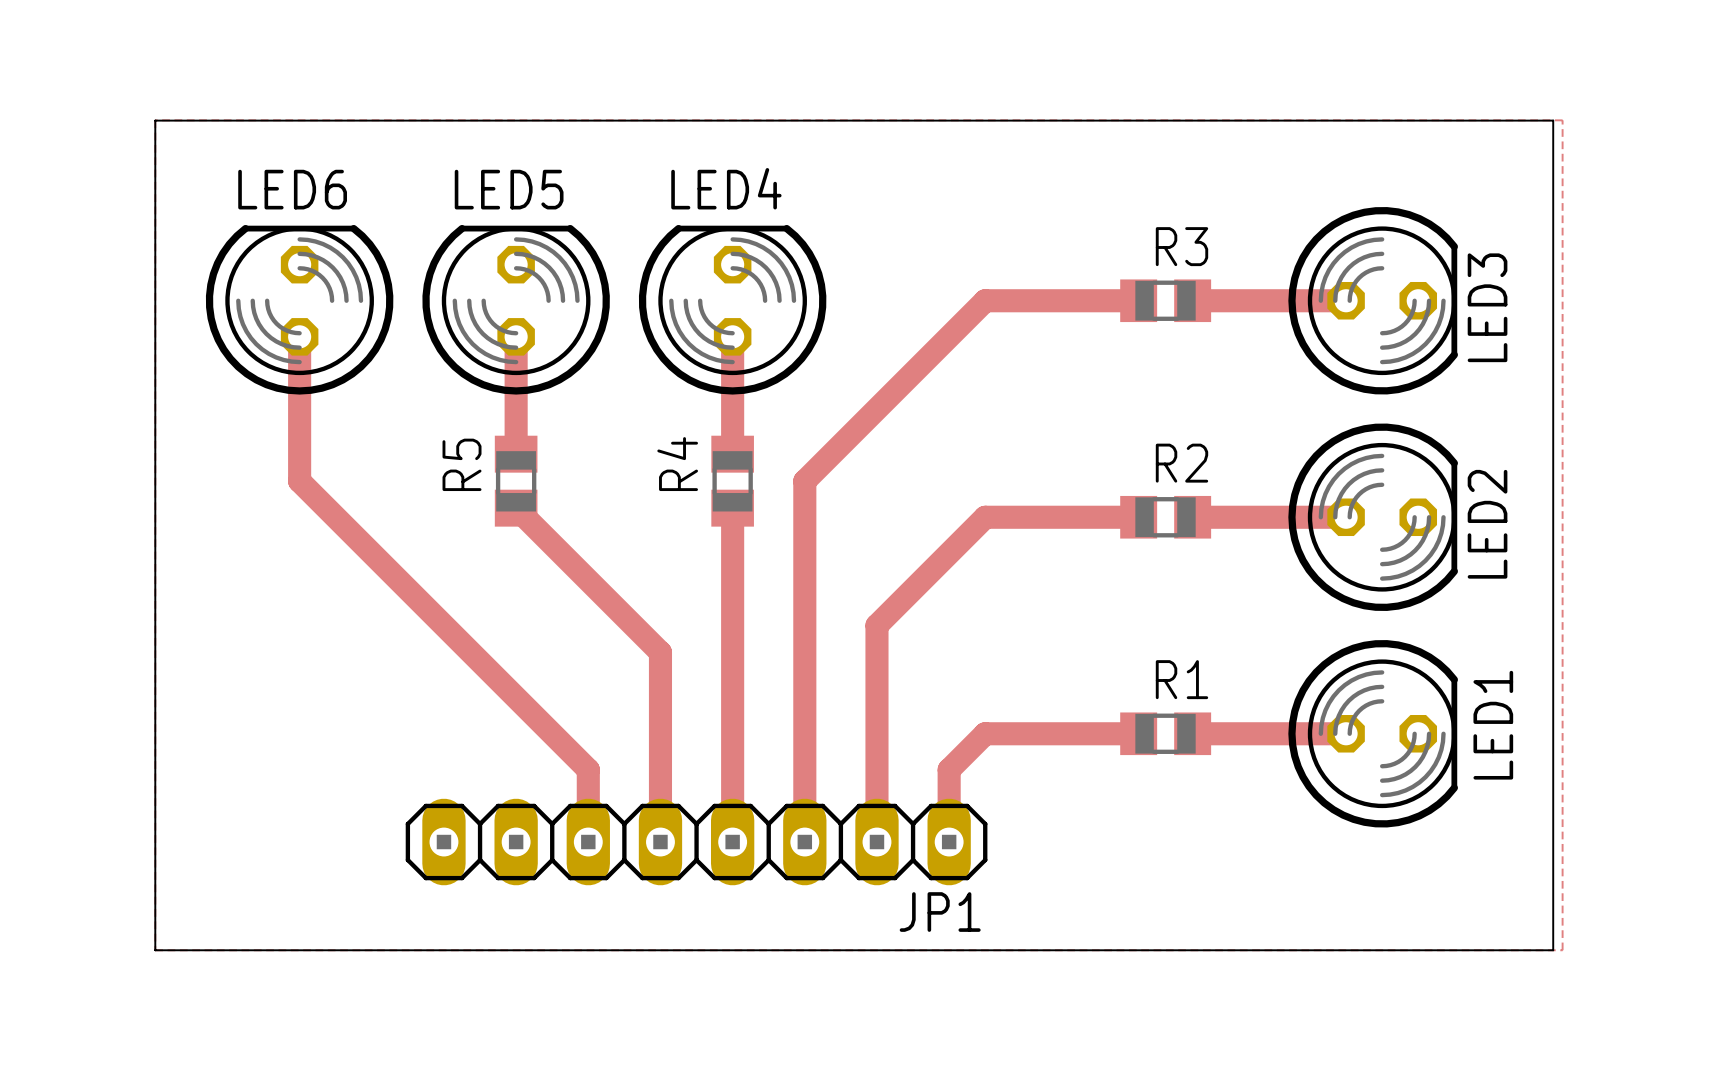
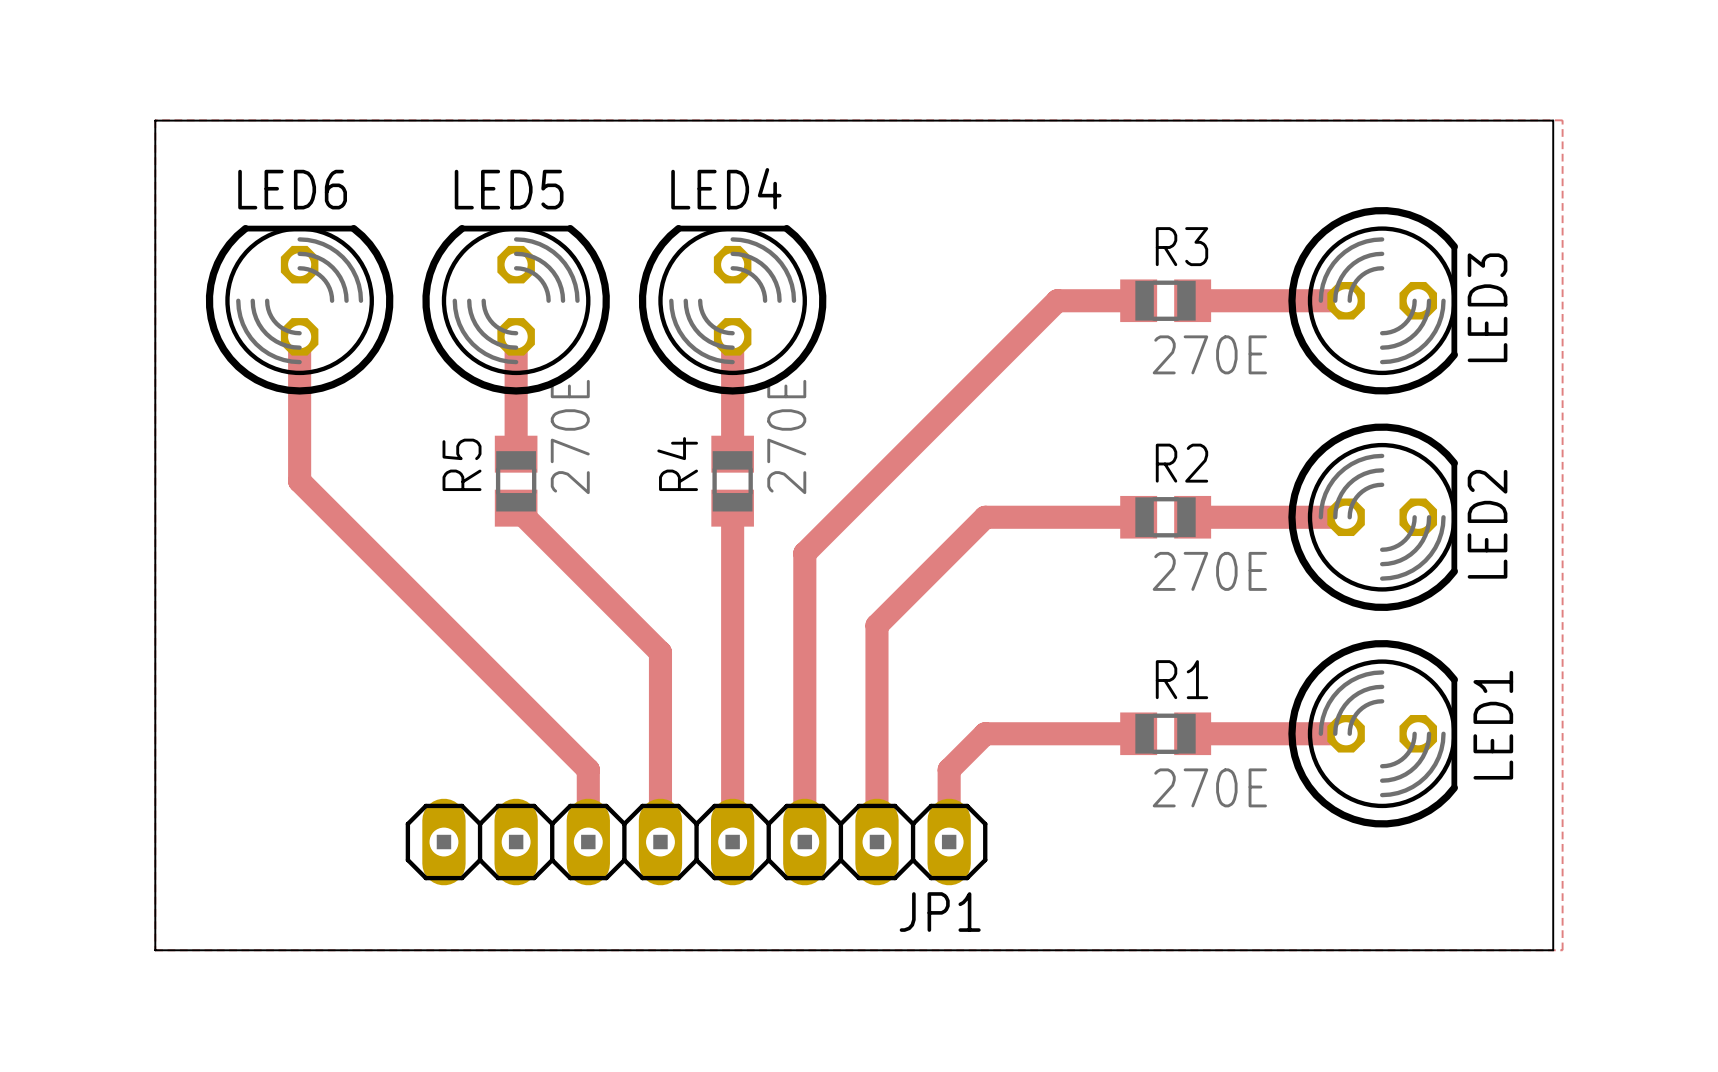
top track: (1057, 300) (985, 300) (804, 481) (804, 553) -> (1057, 300) (804, 553)
R3 value: none -> 270E (1209, 354)
R5 value: none -> 270E (570, 437)
R4 value: none -> 270E (786, 437)
R2 value: none -> 270E (1209, 571)
R1 value: none -> 270E (1209, 787)

